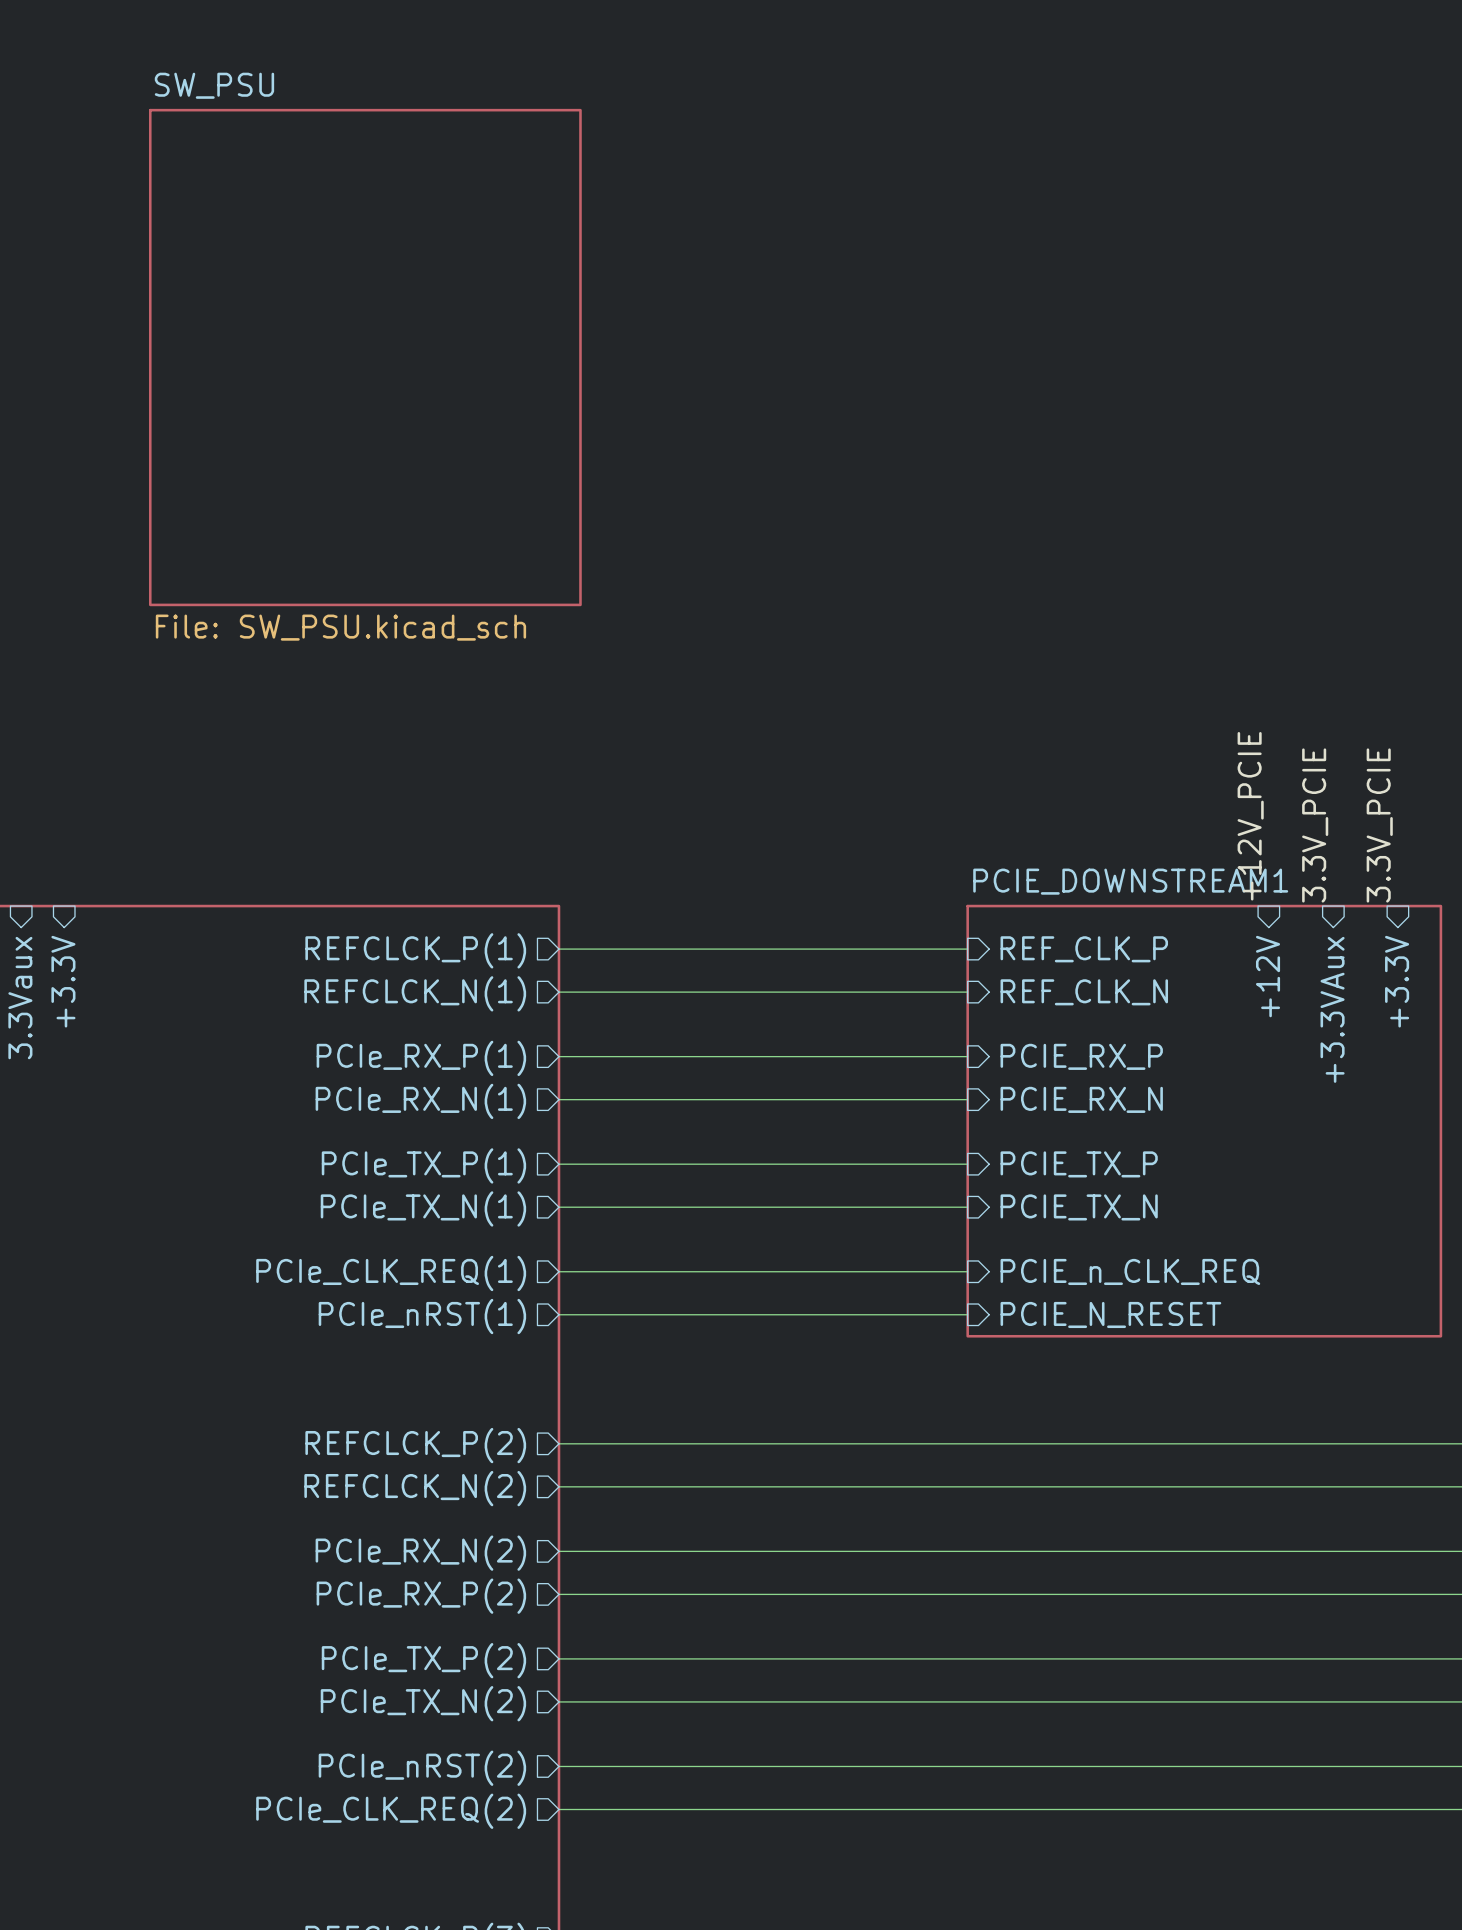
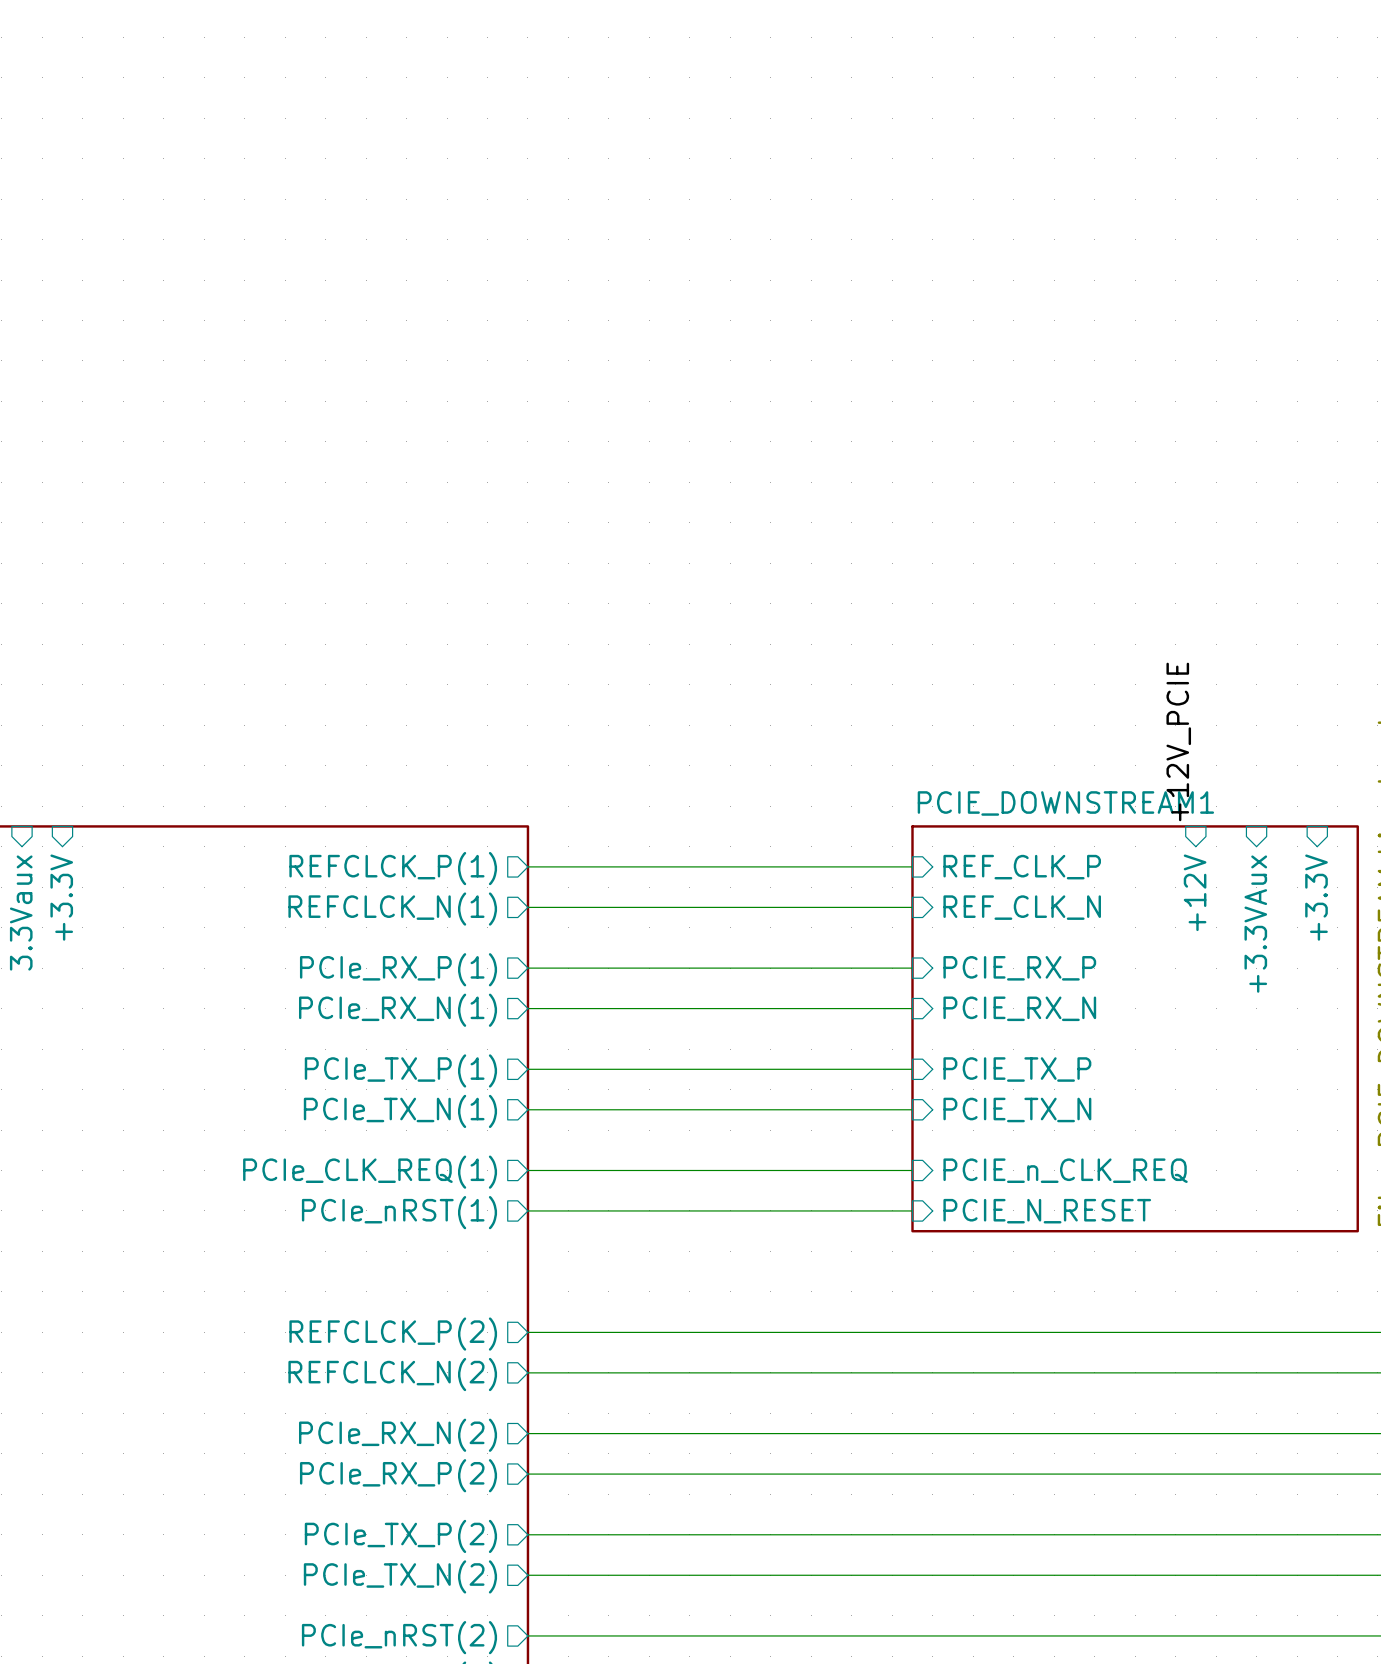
sheet SW_PSU: File: SW_PSU.kicad_sch (365, 357) -> none
label: 3.3V_PCIE (1315, 825) -> none
label: 3.3V_PCIE (1379, 825) -> none

